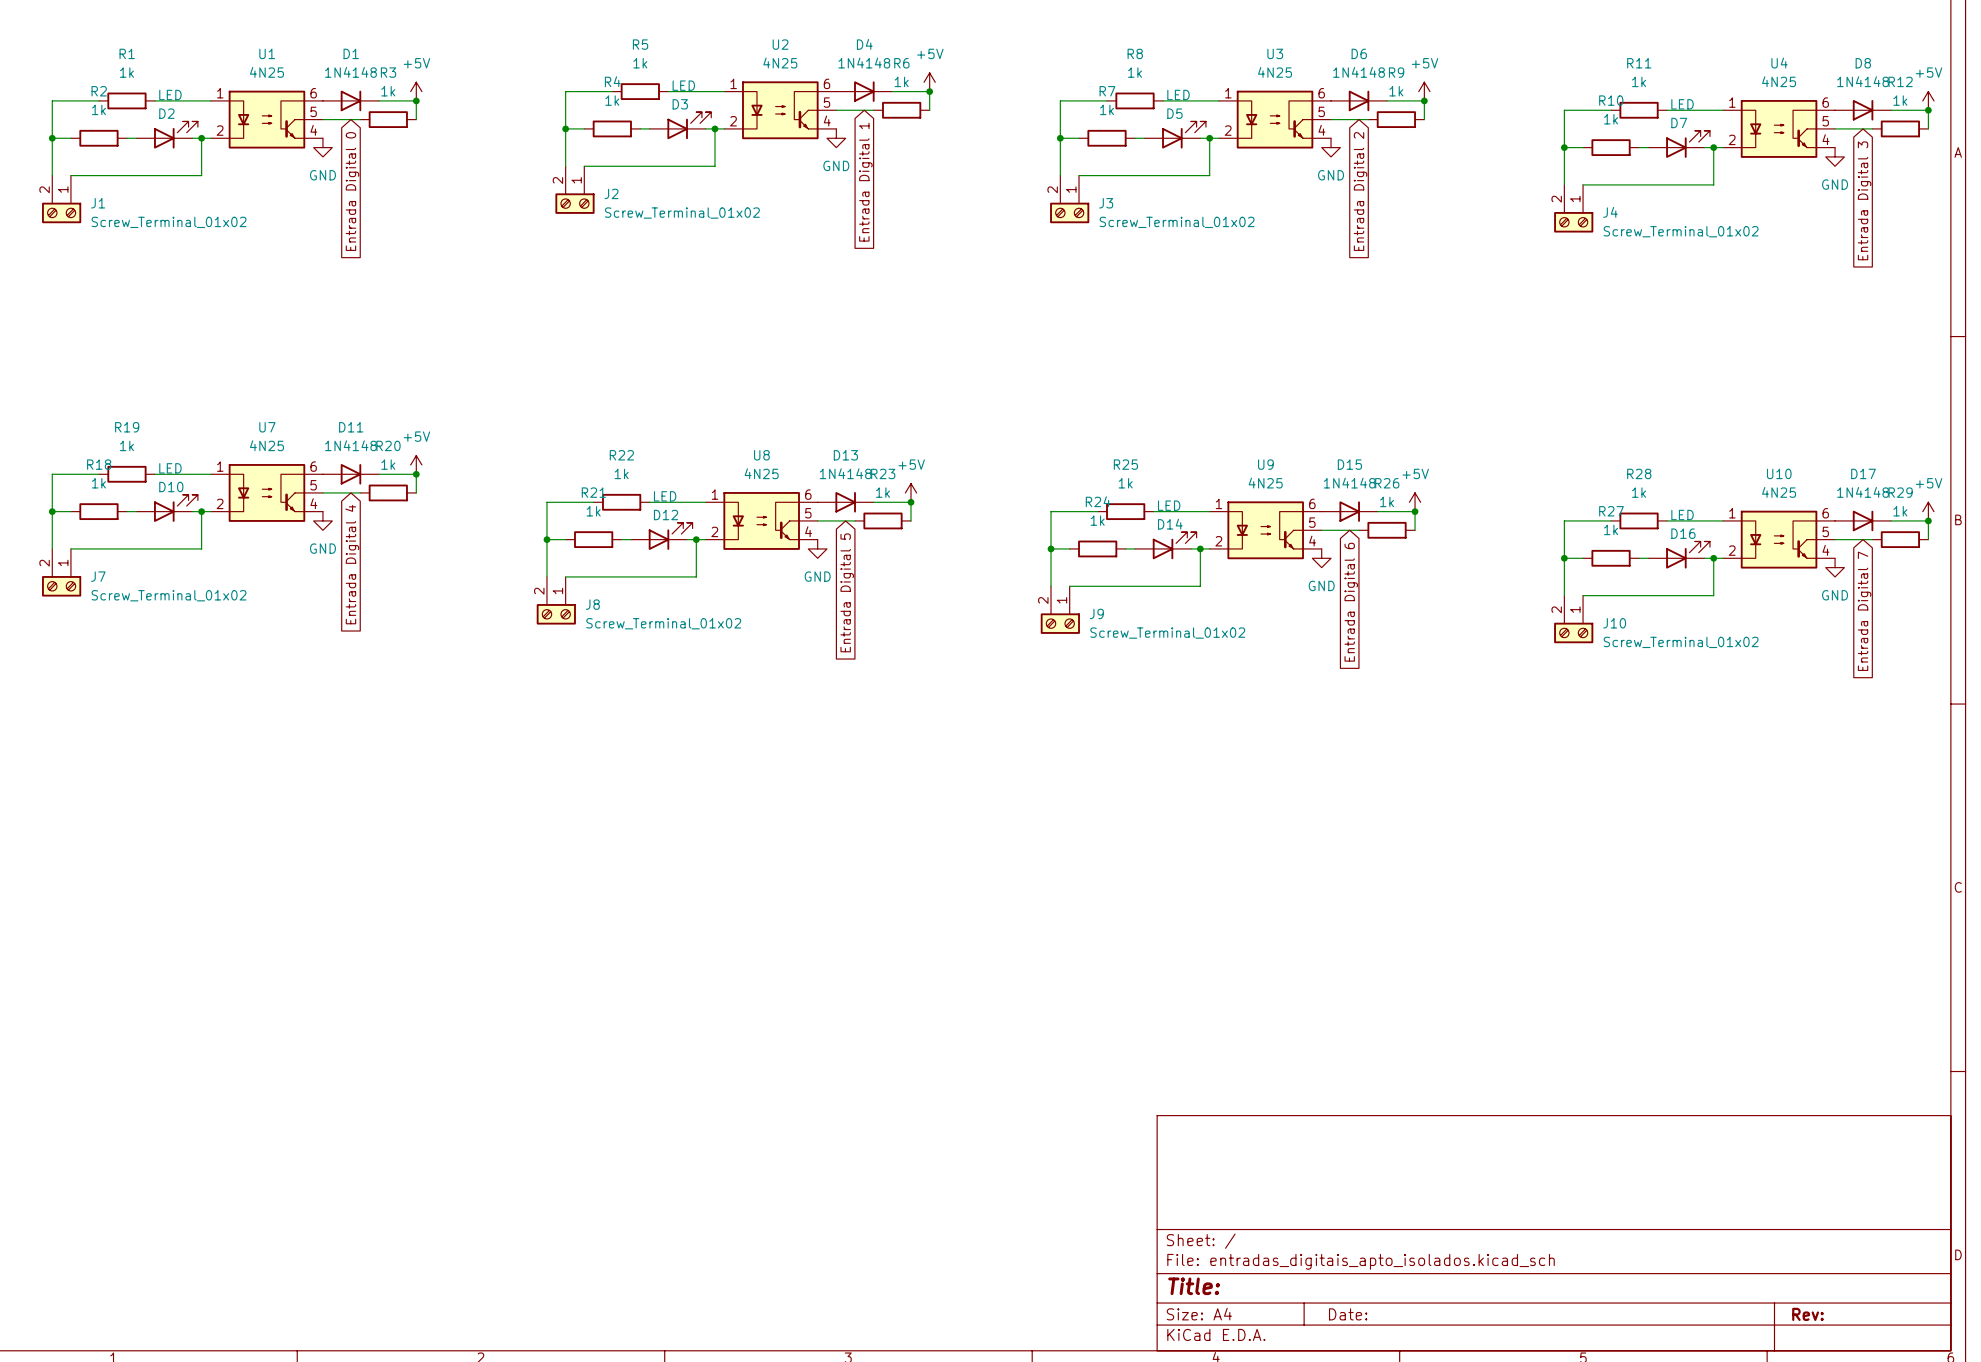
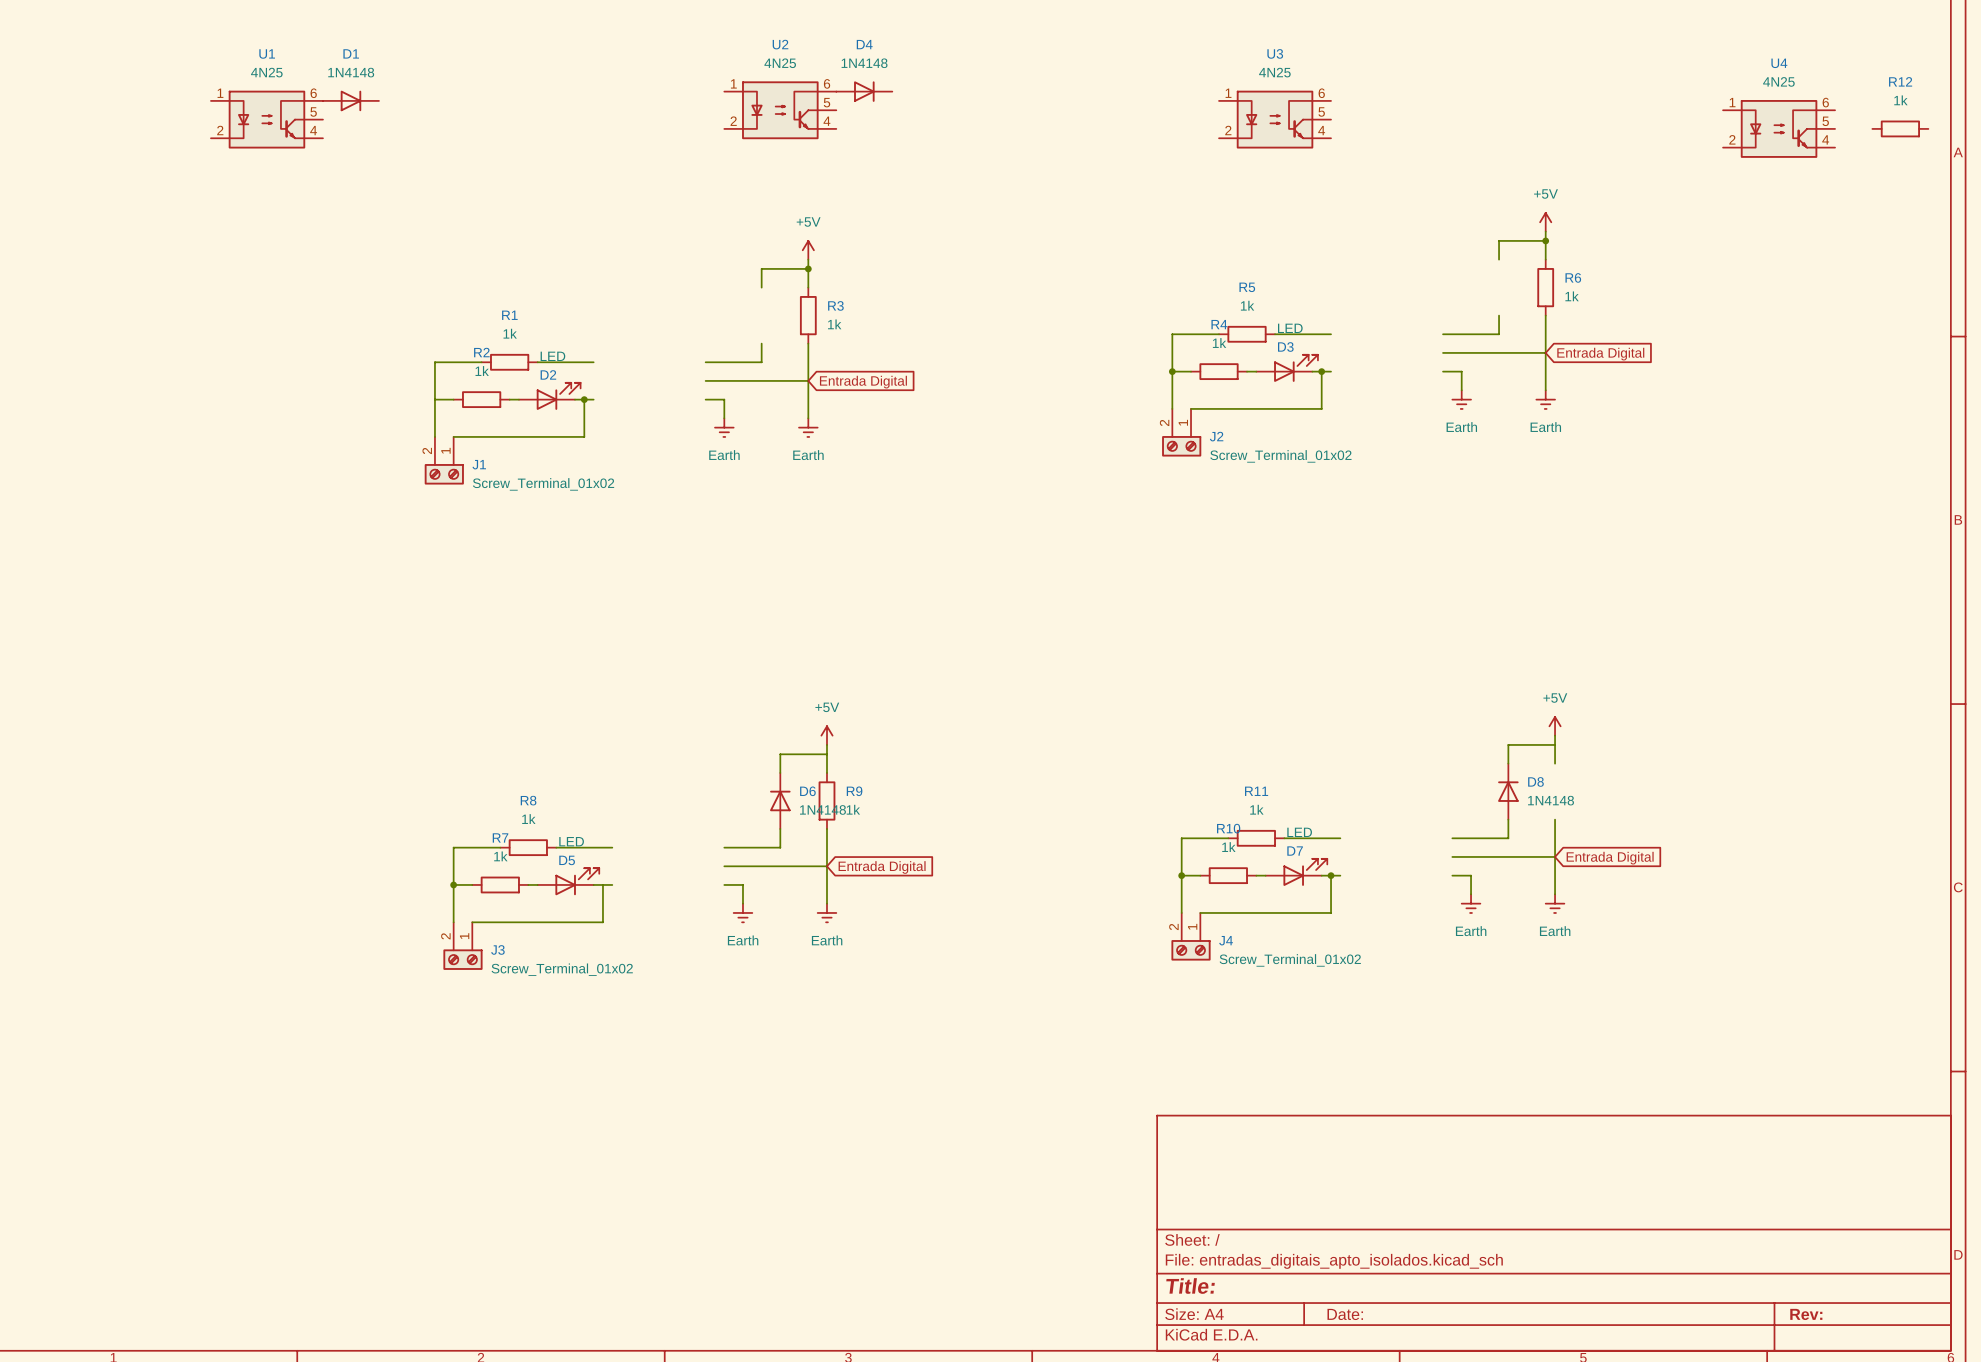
D6 name position: D6 (1359, 53) -> D6 (807, 791)
R6 name position: R6 (901, 63) -> R6 (1573, 277)
D8 name position: D8 (1863, 63) -> D8 (1535, 781)
R3 name position: R3 (388, 72) -> R3 (835, 305)
D6 value position: 1N4148 (1359, 72) -> 1N4148 (822, 809)
R9 name position: R9 (1396, 72) -> R9 (854, 791)
D8 value position: 1N4148 (1863, 81) -> 1N4148 (1551, 800)
power symbol: +5V (929, 82) -> none
power symbol: +5V (416, 91) -> none
wire: (612, 91) (565, 91) (565, 166) -> none
R5 position: (640, 91) -> (1247, 334)
wire: (668, 91) (724, 91) -> none
wire: (892, 91) (929, 91) (929, 110) -> none
junction: (929, 91) -> none
power symbol: +5V (1424, 91) -> none
wire: (98, 100) (52, 100) (52, 175) -> none
R1 position: (126, 100) -> (509, 362)
wire: (154, 100) (210, 100) -> none
wire: (378, 100) (416, 100) (416, 119) -> none
junction: (416, 100) -> none
wire: (1107, 100) (1060, 100) (1060, 175) -> none
R8 position: (1135, 100) -> (528, 847)
wire: (1163, 100) (1219, 100) -> none
D6 rotation: 0° (1359, 100) -> 90° counterclockwise (780, 800)
D6 position: (1359, 100) -> (780, 800)
wire: (1387, 100) (1424, 100) (1424, 119) -> none
junction: (1424, 100) -> none
power symbol: +5V (1928, 100) -> none
wire: (836, 110) (873, 110) -> none
R6 rotation: 0° (901, 110) -> 90° clockwise (1545, 287)
R6 position: (901, 110) -> (1545, 287)
wire: (1611, 110) (1564, 110) (1564, 184) -> none
R11 position: (1639, 110) -> (1256, 838)
wire: (1667, 110) (1723, 110) -> none
D8 rotation: 0° (1863, 110) -> 90° counterclockwise (1508, 791)
D8 position: (1863, 110) -> (1508, 791)
wire: (1891, 110) (1928, 110) (1928, 128) -> none
junction: (1928, 110) -> none
wire: (322, 119) (360, 119) -> none
R3 rotation: 0° (388, 119) -> 90° clockwise (808, 315)
R3 position: (388, 119) -> (808, 315)
wire: (1331, 119) (1368, 119) -> none
R9 rotation: 0° (1396, 119) -> 90° clockwise (826, 800)
R9 position: (1396, 119) -> (826, 800)
D3 position: (680, 125) -> (1287, 368)
wire: (565, 128) (584, 128) -> none
junction: (565, 128) -> none
R4 position: (612, 128) -> (1219, 371)
wire: (640, 128) (649, 128) -> none
wire: (705, 128) (724, 128) -> none
wire: (714, 128) (714, 166) (584, 166) -> none
junction: (714, 128) -> none
wire: (1835, 128) (1872, 128) -> none
D2 position: (167, 135) -> (549, 396)
D5 position: (1175, 135) -> (568, 881)
wire: (52, 138) (70, 138) -> none
junction: (52, 138) -> none
R2 position: (98, 138) -> (481, 399)
wire: (126, 138) (136, 138) -> none
wire: (192, 138) (210, 138) -> none
wire: (201, 138) (201, 175) (70, 175) -> none
junction: (201, 138) -> none
power symbol: GND (836, 138) -> none
wire: (1060, 138) (1079, 138) -> none
junction: (1060, 138) -> none
R7 position: (1107, 138) -> (500, 884)
wire: (1135, 138) (1144, 138) -> none
wire: (1200, 138) (1219, 138) -> none
wire: (1209, 138) (1209, 175) (1079, 175) -> none
junction: (1209, 138) -> none
D7 position: (1679, 144) -> (1296, 872)
power symbol: GND (322, 147) -> none
power symbol: GND (1331, 147) -> none
wire: (1564, 147) (1583, 147) -> none
junction: (1564, 147) -> none
R10 position: (1611, 147) -> (1228, 875)
wire: (1639, 147) (1648, 147) -> none
wire: (1704, 147) (1723, 147) -> none
wire: (1713, 147) (1713, 184) (1583, 184) -> none
junction: (1713, 147) -> none
power symbol: GND (1835, 156) -> none
global label: Entrada Digital 1 (865, 182) -> none
J2 position: (574, 190) -> (1181, 432)
global label: Entrada Digital 0 (352, 191) -> none
global label: Entrada Digital 2 (1360, 191) -> none
J1 position: (61, 199) -> (444, 460)
J3 position: (1069, 199) -> (462, 946)
global label: Entrada Digital 3 (1864, 200) -> none
J4 position: (1573, 208) -> (1191, 936)
power symbol: none -> +5V (1545, 222)
wire: none -> (1545, 231) (1545, 259)
wire: none -> (1545, 240) (1499, 240) (1499, 259)
junction: none -> (1545, 240)
power symbol: none -> +5V (808, 250)
wire: none -> (808, 259) (808, 287)
wire: none -> (808, 268) (761, 268) (761, 287)
junction: none -> (808, 268)
wire: none -> (1499, 315) (1499, 334) (1443, 334)
wire: none -> (1545, 315) (1545, 390)
wire: none -> (1219, 334) (1172, 334) (1172, 408)
wire: none -> (1275, 334) (1331, 334)
wire: none -> (761, 343) (761, 362) (705, 362)
wire: none -> (808, 343) (808, 418)
wire: none -> (1443, 352) (1545, 352)
global label: none -> Entrada Digital (1600, 354)
junction: none -> (1172, 371)
wire: none -> (1247, 371) (1256, 371)
wire: none -> (1312, 371) (1331, 371)
wire: none -> (1321, 371) (1321, 408) (1191, 408)
junction: none -> (1321, 371)
wire: none -> (1443, 371) (1461, 371) (1461, 390)
wire: none -> (705, 380) (808, 380)
global label: none -> Entrada Digital (863, 382)
junction: none -> (584, 399)
wire: none -> (705, 399) (724, 399) (724, 418)
power symbol: none -> Earth (1461, 399)
power symbol: none -> Earth (1545, 399)
power symbol: none -> Earth (724, 427)
power symbol: none -> Earth (808, 427)
power symbol: +5V (416, 464) -> none
wire: (98, 474) (52, 474) (52, 548) -> none
R19: 1k (126, 474) -> none
wire: (154, 474) (210, 474) -> none
D11: 1N4148 (350, 474) -> none
wire: (378, 474) (416, 474) (416, 492) -> none
junction: (416, 474) -> none
U7: 4N25 (266, 492) -> none
wire: (322, 492) (360, 492) -> none
R20: 1k (388, 492) -> none
power symbol: +5V (911, 492) -> none
wire: (593, 502) (546, 502) (546, 576) -> (481, 362) (434, 362) (434, 436)
R22: 1k (621, 502) -> none
wire: (649, 502) (705, 502) -> (537, 362) (593, 362)
D13: 1N4148 (845, 502) -> none
wire: (873, 502) (911, 502) (911, 520) -> none
junction: (911, 502) -> none
power symbol: +5V (1415, 502) -> none
D10: LED (167, 508) -> none
wire: (52, 511) (70, 511) -> none
junction: (52, 511) -> none
R18: 1k (98, 511) -> none
wire: (126, 511) (136, 511) -> none
wire: (192, 511) (210, 511) -> none
wire: (201, 511) (201, 548) (70, 548) -> none
junction: (201, 511) -> none
wire: (1097, 511) (1051, 511) (1051, 586) -> none
R25: 1k (1125, 511) -> none
wire: (1153, 511) (1209, 511) -> none
D15: 1N4148 (1349, 511) -> none
wire: (1377, 511) (1415, 511) (1415, 530) -> none
junction: (1415, 511) -> none
power symbol: +5V (1928, 511) -> none
power symbol: GND (322, 520) -> none
U8: 4N25 (761, 520) -> none
wire: (817, 520) (854, 520) -> none
R23: 1k (883, 520) -> none
wire: (1611, 520) (1564, 520) (1564, 595) -> none
R28: 1k (1639, 520) -> none
wire: (1667, 520) (1723, 520) -> none
D17: 1N4148 (1863, 520) -> none
wire: (1891, 520) (1928, 520) (1928, 539) -> none
junction: (1928, 520) -> none
U9: 4N25 (1265, 530) -> none
wire: (1321, 530) (1359, 530) -> none
R26: 1k (1387, 530) -> none
D12: LED (661, 536) -> none
wire: (546, 539) (565, 539) -> (434, 399) (453, 399)
junction: (546, 539) -> none
R21: 1k (593, 539) -> none
wire: (621, 539) (630, 539) -> (509, 399) (518, 399)
wire: (686, 539) (705, 539) -> (574, 399) (593, 399)
wire: (696, 539) (696, 576) (565, 576) -> (584, 399) (584, 436) (453, 436)
junction: (696, 539) -> none
U10: 4N25 (1779, 539) -> none
wire: (1835, 539) (1872, 539) -> none
R29: 1k (1900, 539) -> none
D14: LED (1165, 545) -> none
power symbol: GND (817, 548) -> none
wire: (1051, 548) (1069, 548) -> none
junction: (1051, 548) -> none
R24: 1k (1097, 548) -> none
wire: (1125, 548) (1135, 548) -> none
wire: (1191, 548) (1209, 548) -> (1172, 371) (1191, 371)
wire: (1200, 548) (1200, 586) (1069, 586) -> none
junction: (1200, 548) -> none
D16: LED (1679, 555) -> none
power symbol: GND (1321, 558) -> none
wire: (1564, 558) (1583, 558) -> none
junction: (1564, 558) -> none
R27: 1k (1611, 558) -> none
wire: (1639, 558) (1648, 558) -> none
wire: (1704, 558) (1723, 558) -> none
wire: (1713, 558) (1713, 595) (1583, 595) -> none
junction: (1713, 558) -> none
global label: Entrada Digital 4 (352, 564) -> none
power symbol: GND (1835, 567) -> none
J7: Screw_Terminal_01x02 (61, 572) -> none
global label: Entrada Digital 5 (847, 592) -> none
J8: Screw_Terminal_01x02 (556, 600) -> none
global label: Entrada Digital 6 (1351, 602) -> none
J9: Screw_Terminal_01x02 (1060, 610) -> none
global label: Entrada Digital 7 (1864, 611) -> none
J10: Screw_Terminal_01x02 (1573, 619) -> none
power symbol: none -> +5V (1555, 726)
power symbol: none -> +5V (826, 735)
wire: none -> (1555, 735) (1555, 763)
wire: none -> (826, 744) (826, 772)
wire: none -> (1555, 744) (1508, 744) (1508, 763)
wire: none -> (826, 754) (780, 754) (780, 772)
wire: none -> (1508, 819) (1508, 838) (1452, 838)
wire: none -> (1555, 819) (1555, 894)
wire: none -> (780, 828) (780, 847) (724, 847)
wire: none -> (826, 828) (826, 903)
wire: none -> (1228, 838) (1181, 838) (1181, 912)
wire: none -> (1284, 838) (1340, 838)
wire: none -> (500, 847) (453, 847) (453, 922)
wire: none -> (556, 847) (612, 847)
wire: none -> (1452, 856) (1555, 856)
global label: none -> Entrada Digital (1610, 858)
wire: none -> (724, 866) (826, 866)
global label: none -> Entrada Digital (882, 867)
wire: none -> (1181, 875) (1200, 875)
junction: none -> (1181, 875)
wire: none -> (1256, 875) (1265, 875)
wire: none -> (1321, 875) (1340, 875)
wire: none -> (1331, 875) (1331, 912) (1200, 912)
junction: none -> (1331, 875)
wire: none -> (1452, 875) (1471, 875) (1471, 894)
wire: none -> (453, 884) (472, 884)
junction: none -> (453, 884)
wire: none -> (528, 884) (537, 884)
wire: none -> (593, 884) (612, 884)
wire: none -> (602, 884) (602, 922) (472, 922)
wire: none -> (724, 884) (742, 884) (742, 903)
power symbol: none -> Earth (1471, 903)
power symbol: none -> Earth (1555, 903)
power symbol: none -> Earth (742, 912)
power symbol: none -> Earth (826, 912)

